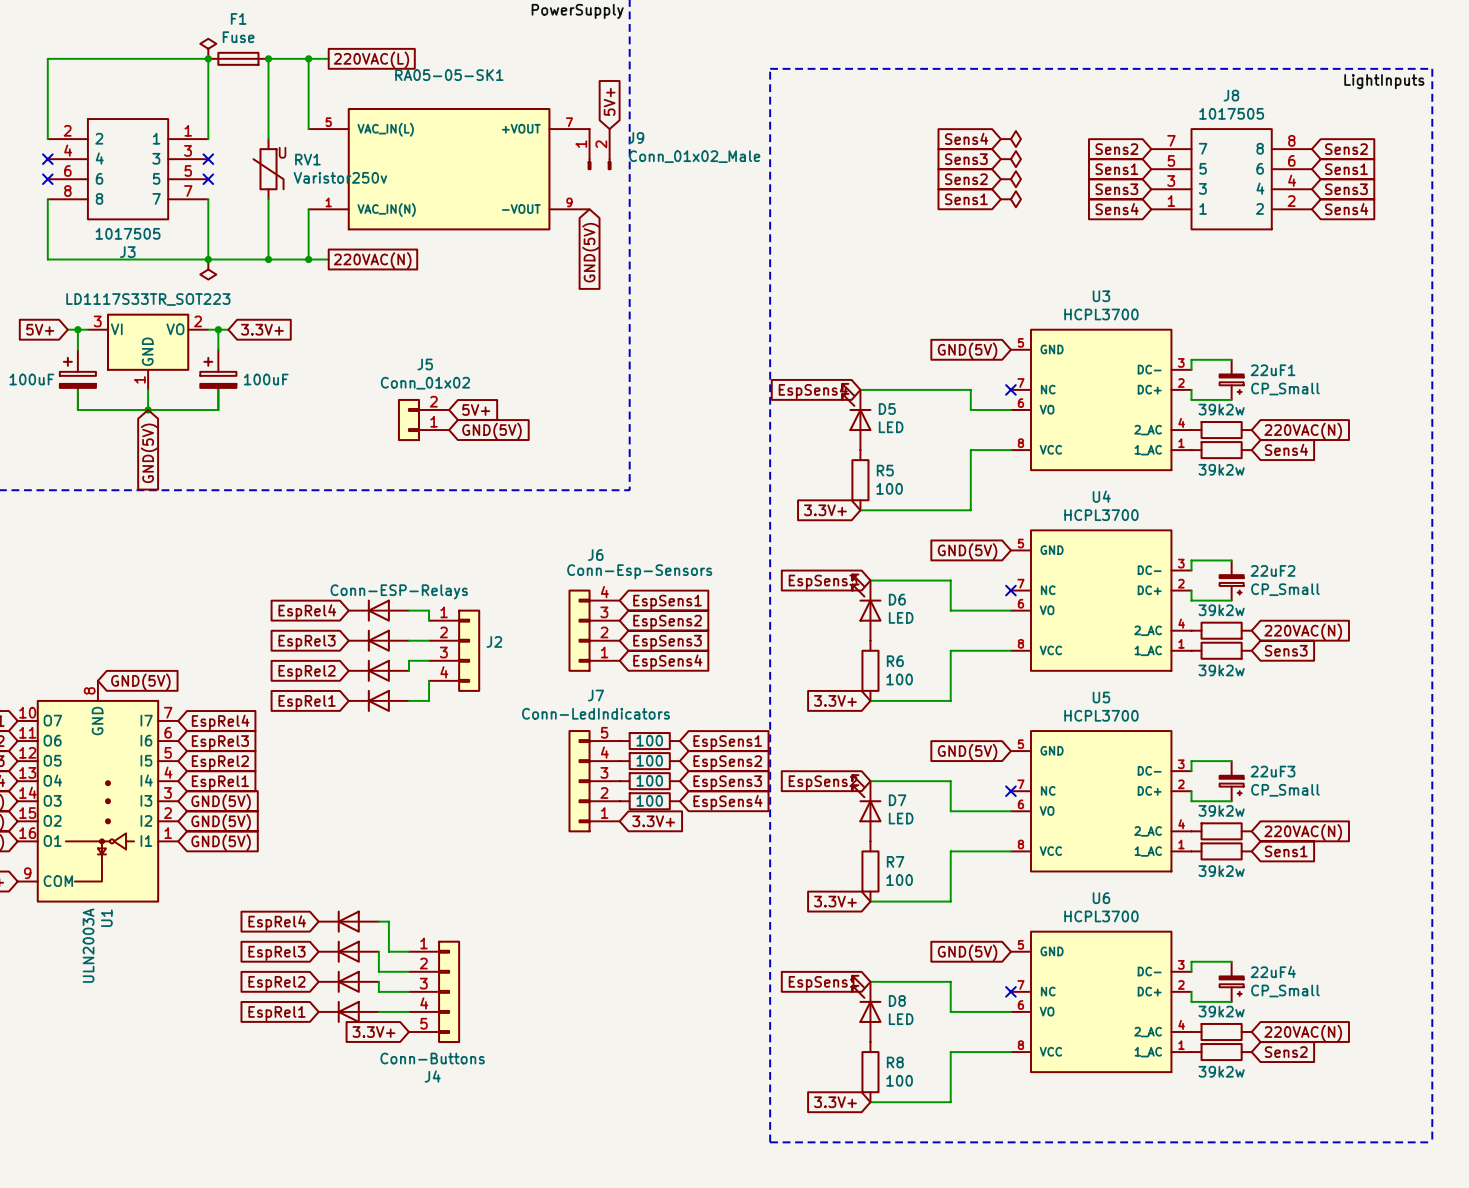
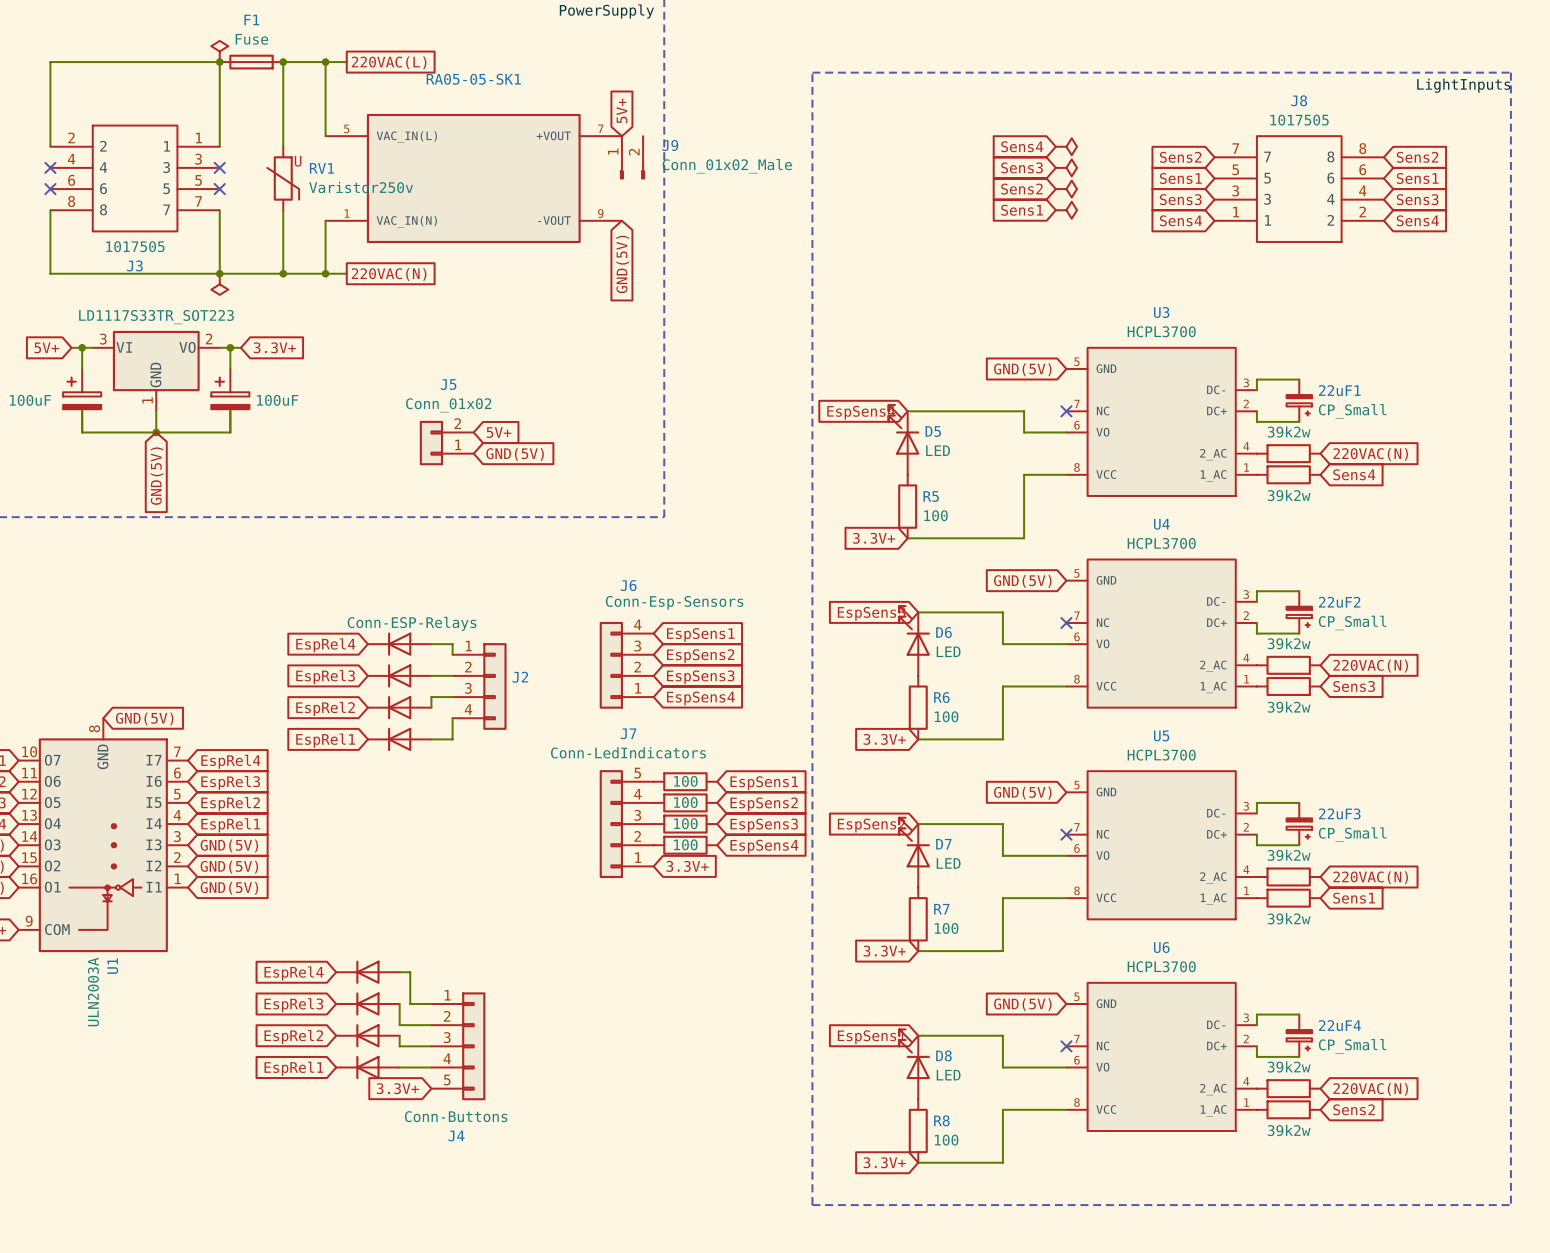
global label position: 5V+ (609, 101) -> 5V+ (622, 110)

